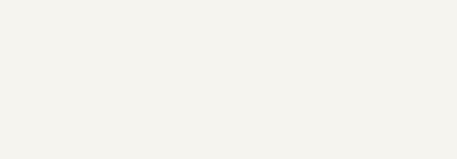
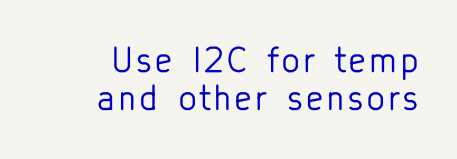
text: none -> Use I2C for temp (265, 63)
text: none -> and other sensors (257, 97)

